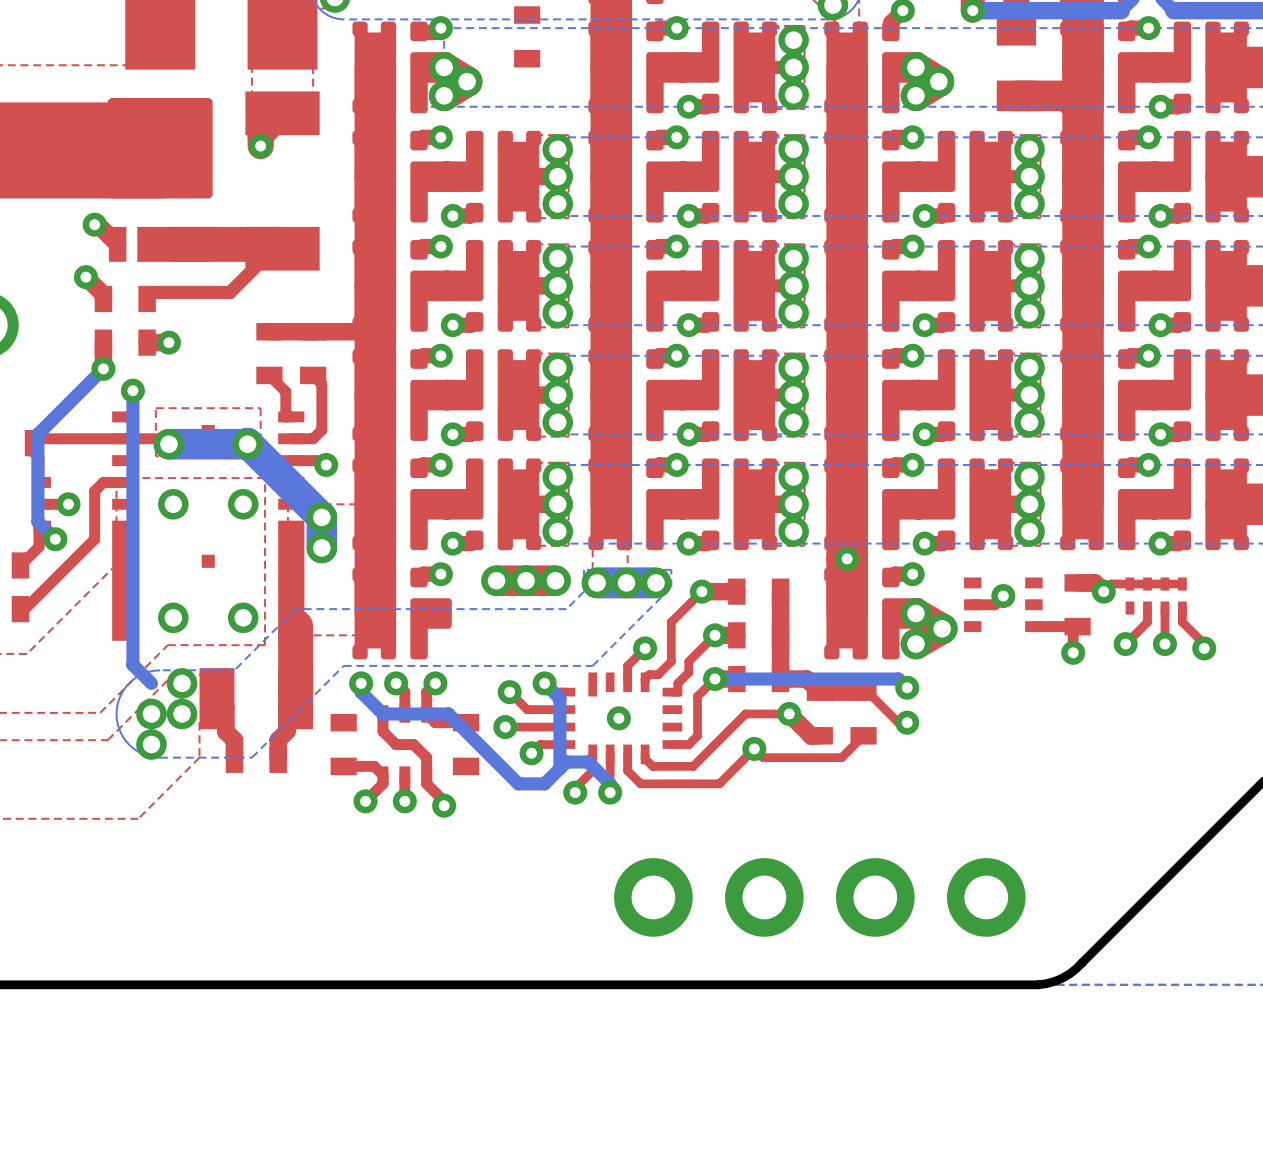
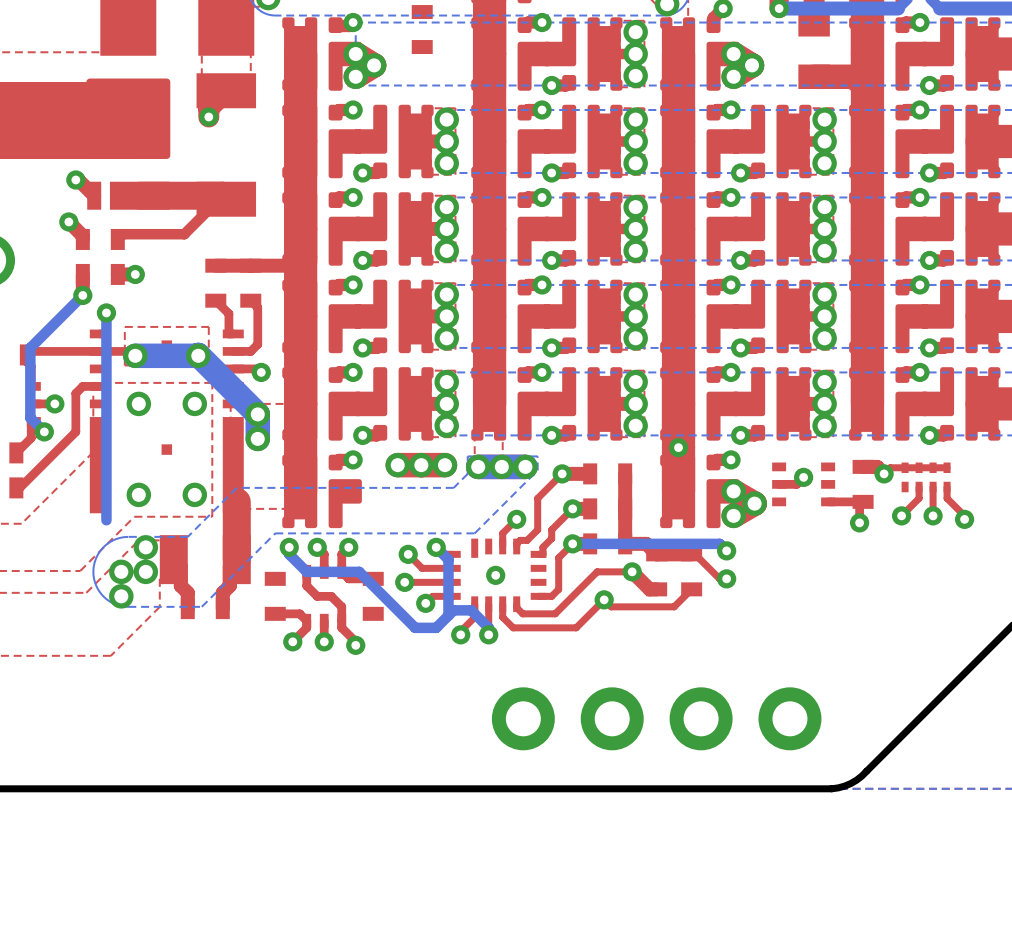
bottom track: (132, 649) (132, 664) (151, 683) -> none

